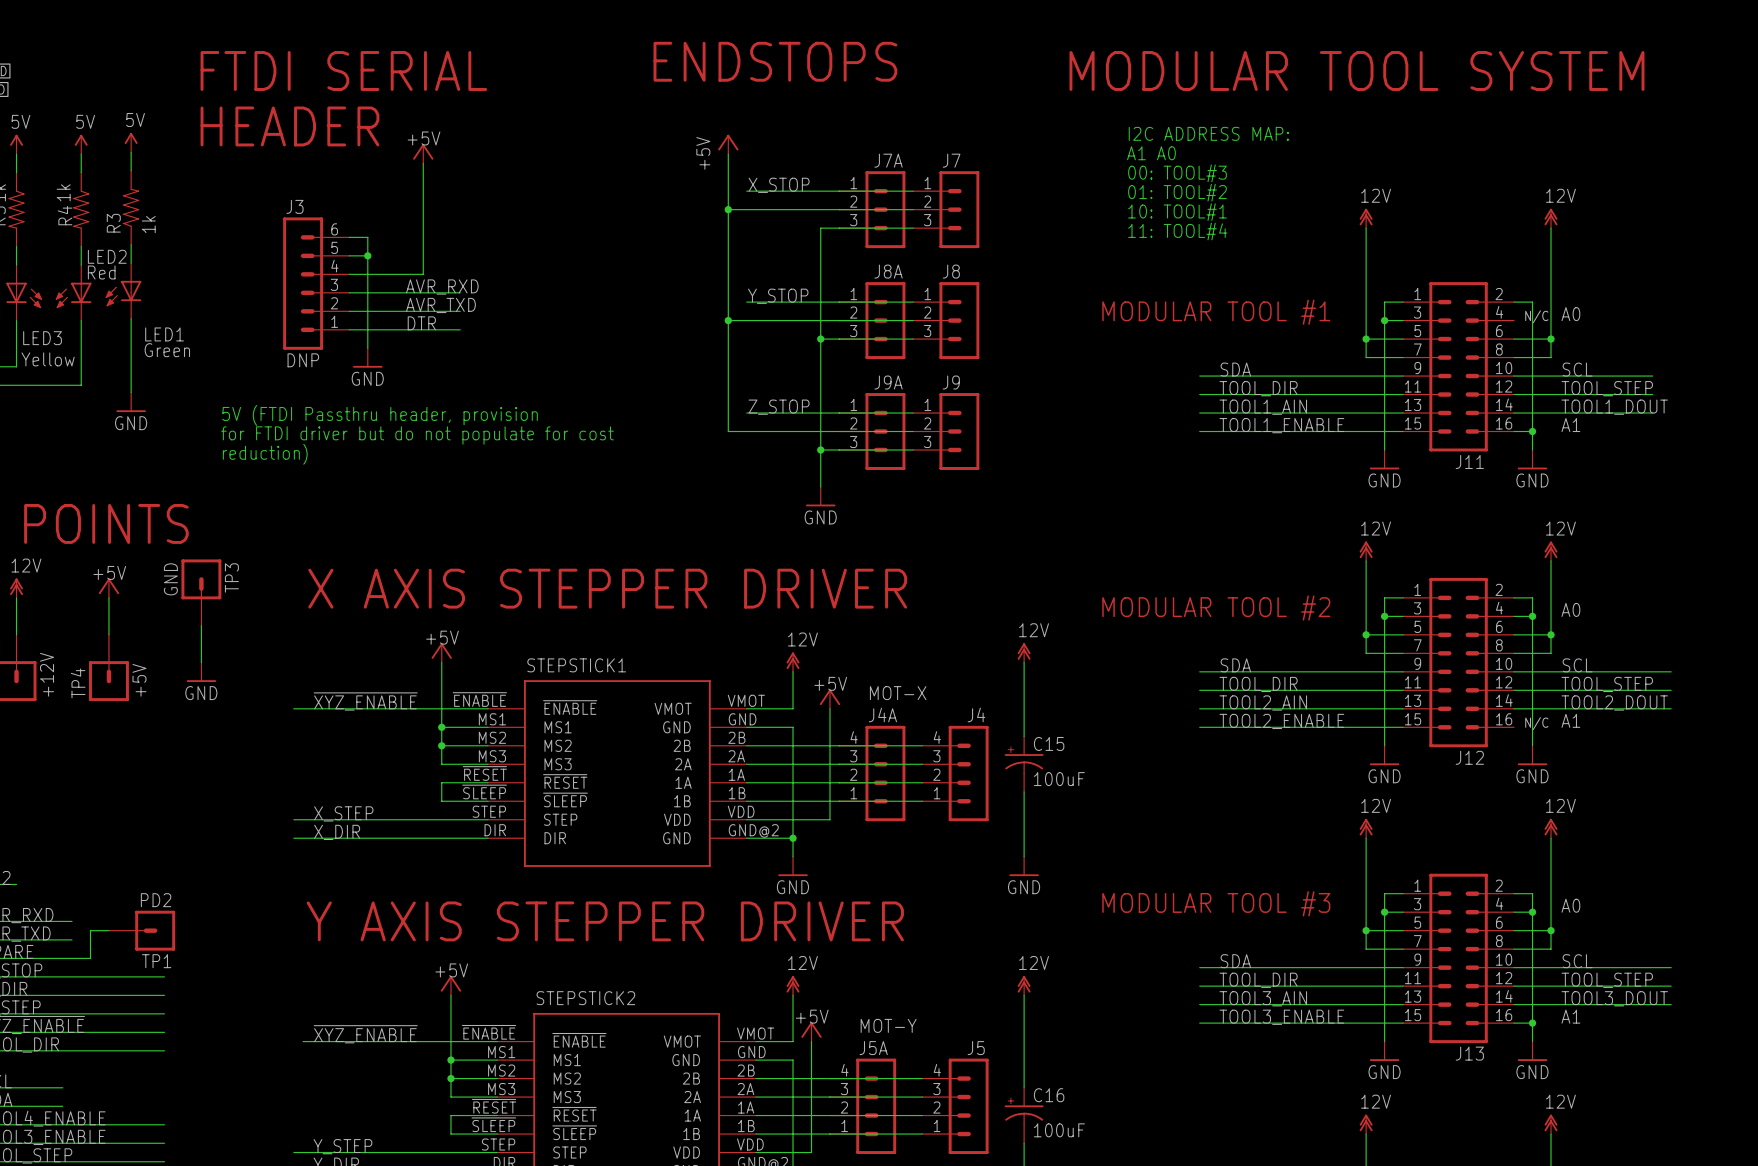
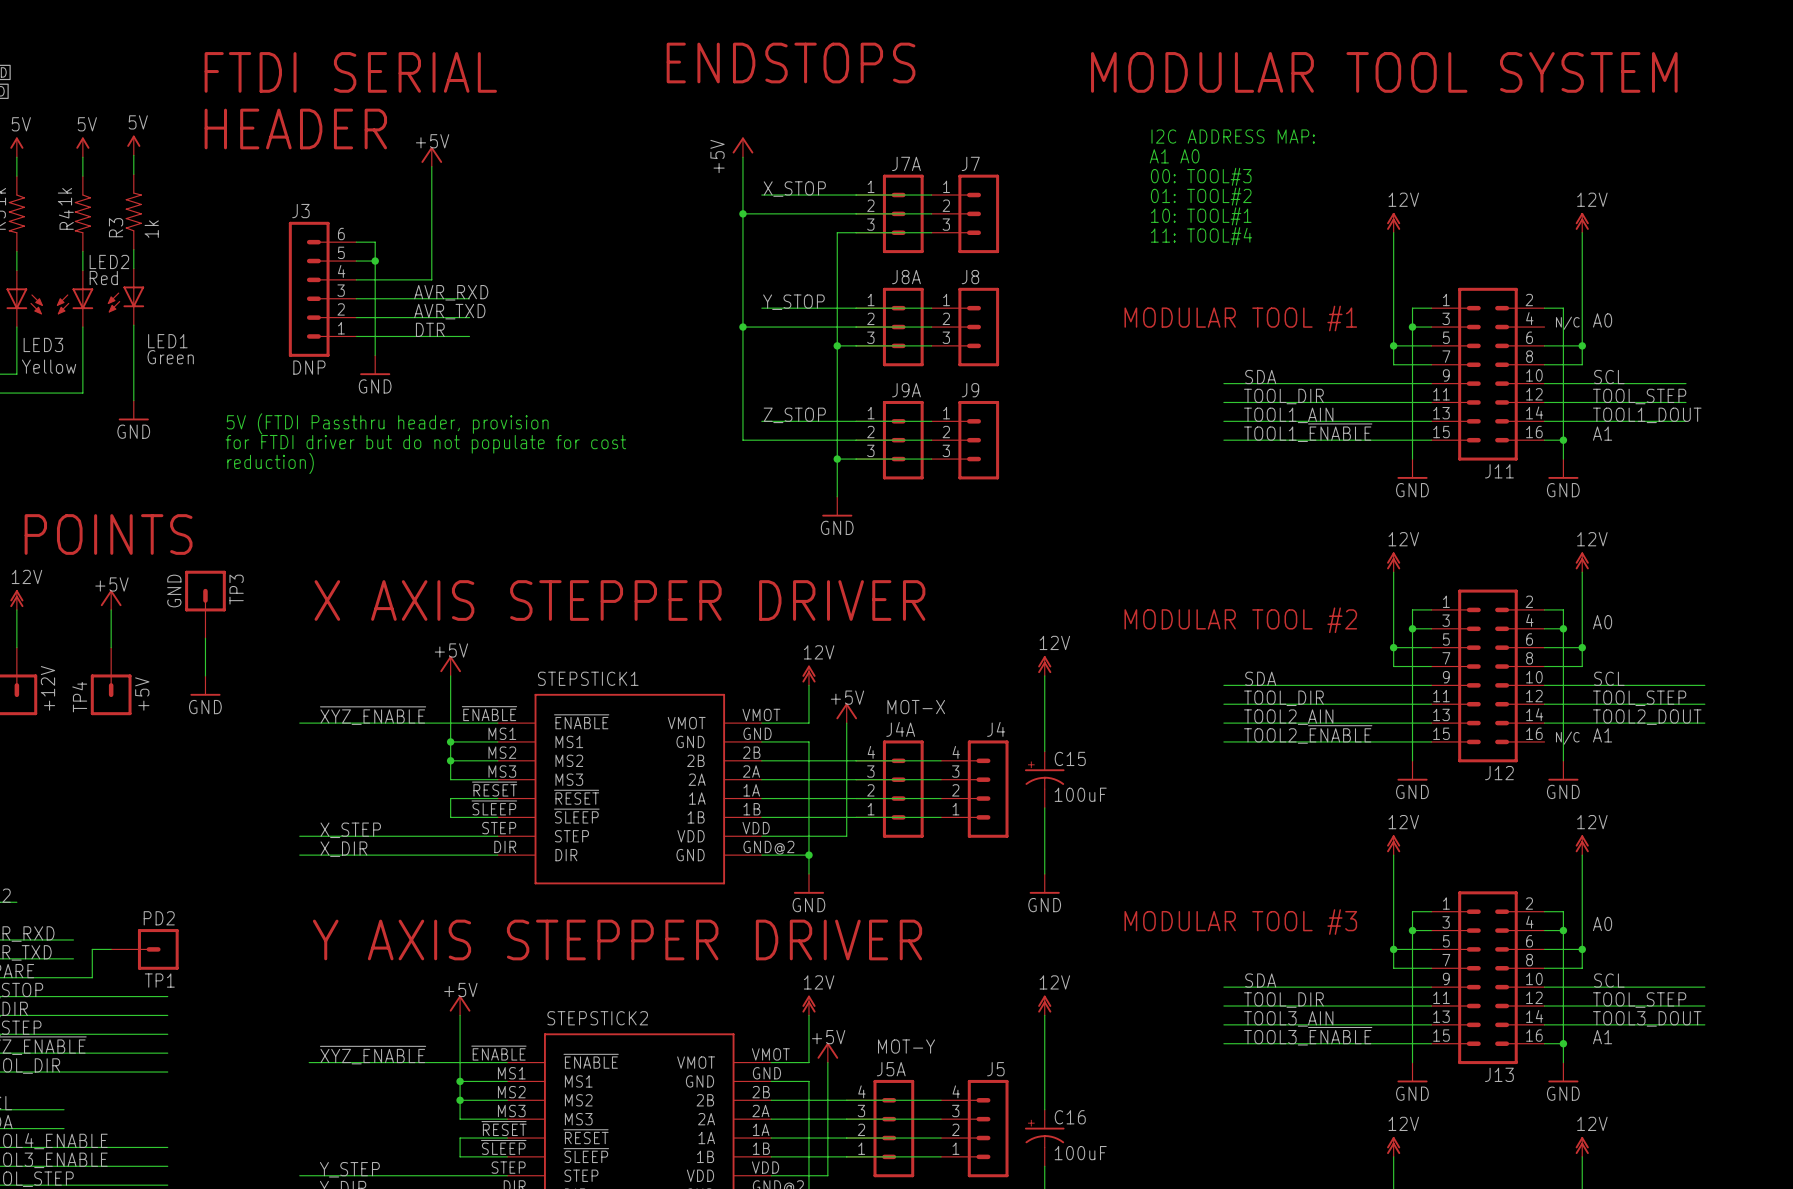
label: TOOL1_ENABLE (1281, 425) -> TOOL1_~{ENABLE} (1308, 432)
label: TOOL2_ENABLE (1281, 721) -> TOOL2_~{ENABLE} (1308, 734)
label: TOOL3_ENABLE (1281, 1017) -> TOOL3_~{ENABLE} (1308, 1036)

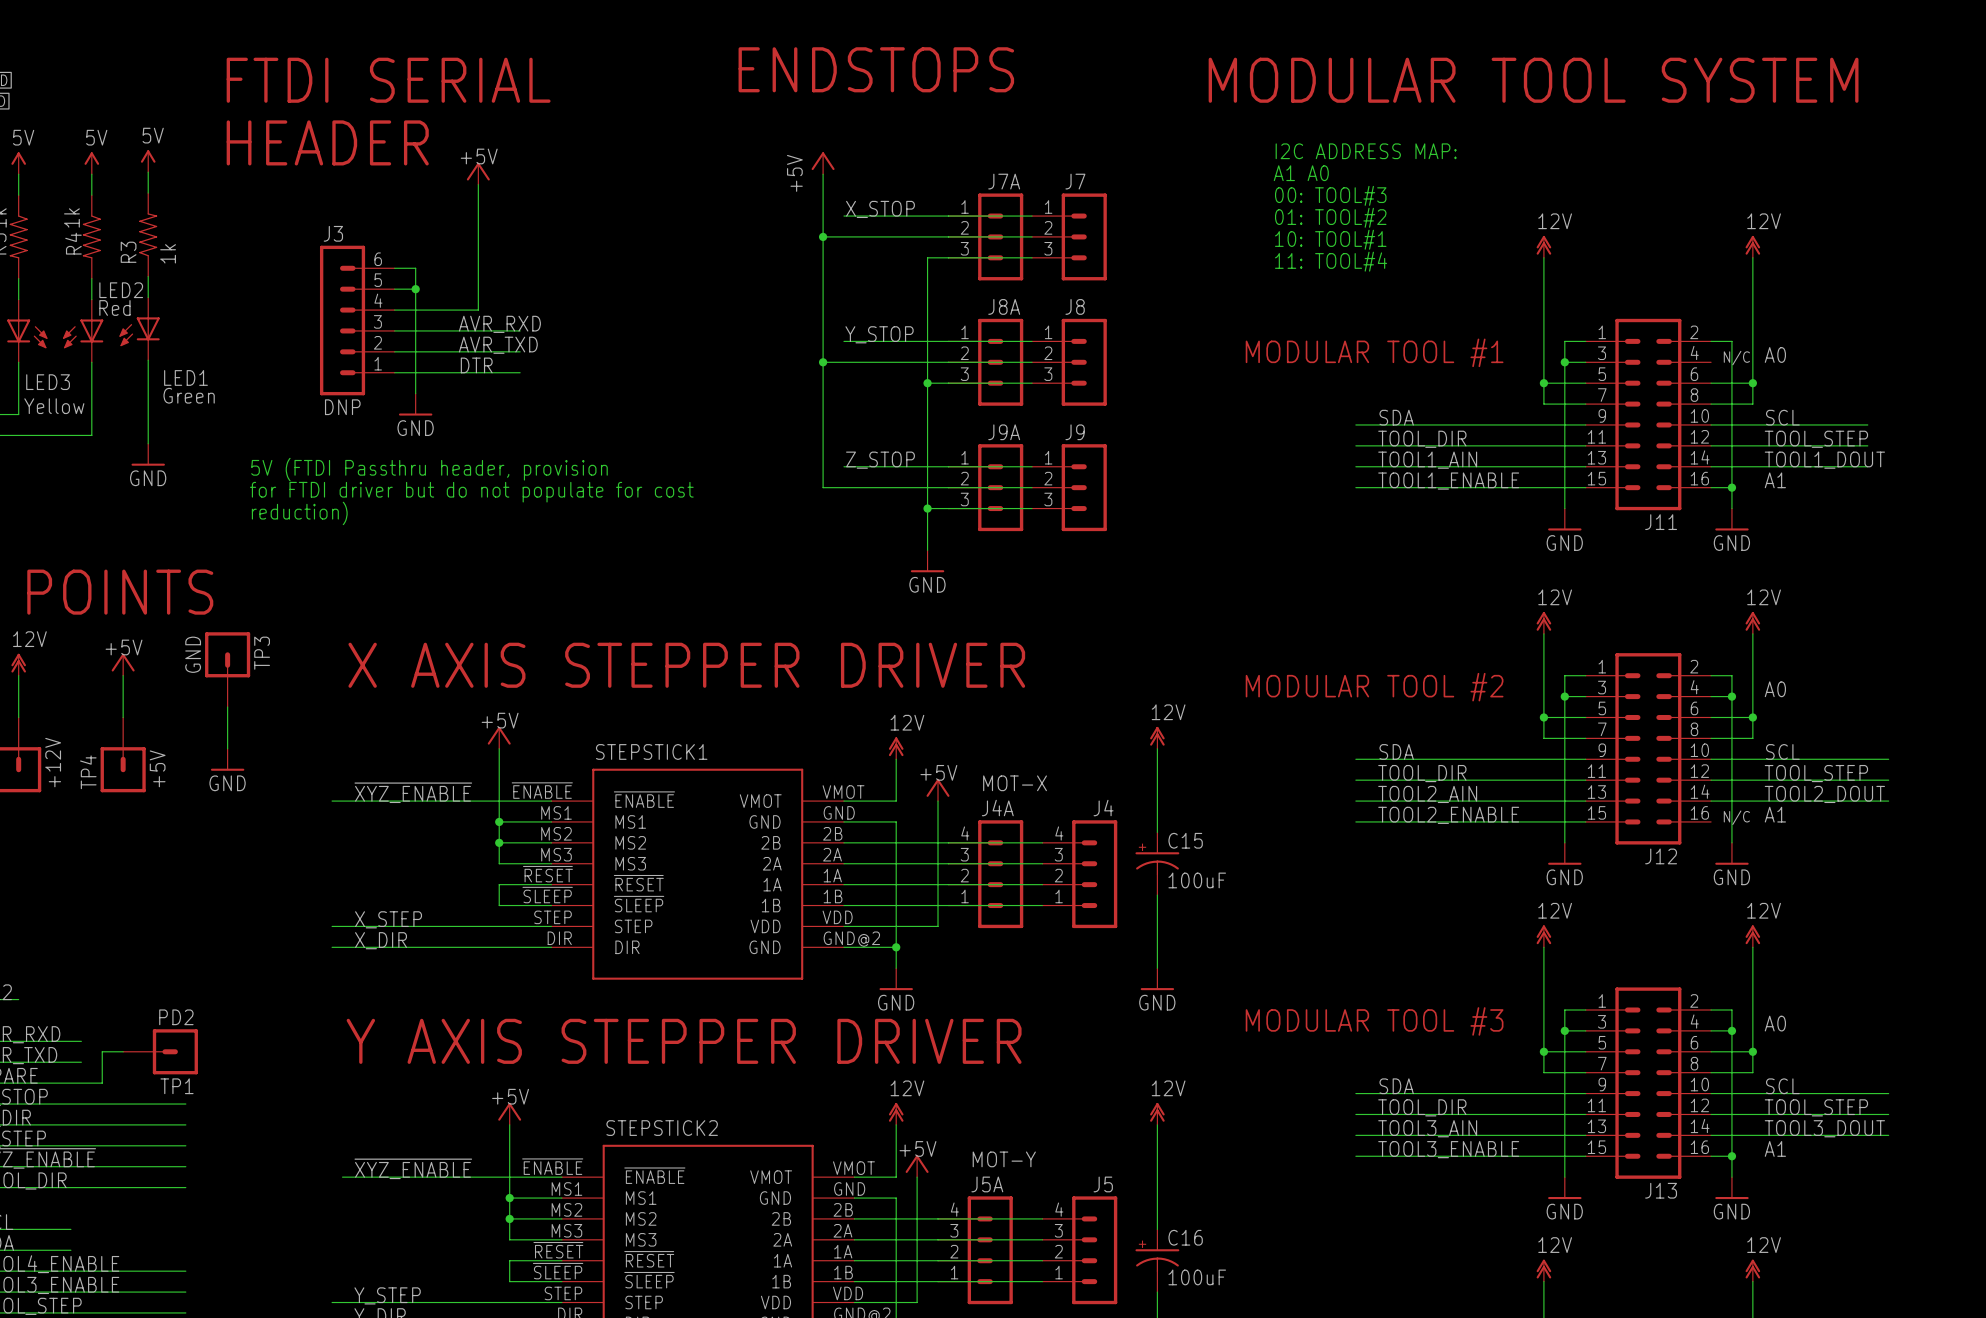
label: TOOL1_~{ENABLE} (1308, 432) -> TOOL1_ENABLE (1448, 481)
label: TOOL2_~{ENABLE} (1308, 734) -> TOOL2_ENABLE (1448, 815)
label: TOOL3_~{ENABLE} (1308, 1036) -> TOOL3_ENABLE (1448, 1149)

